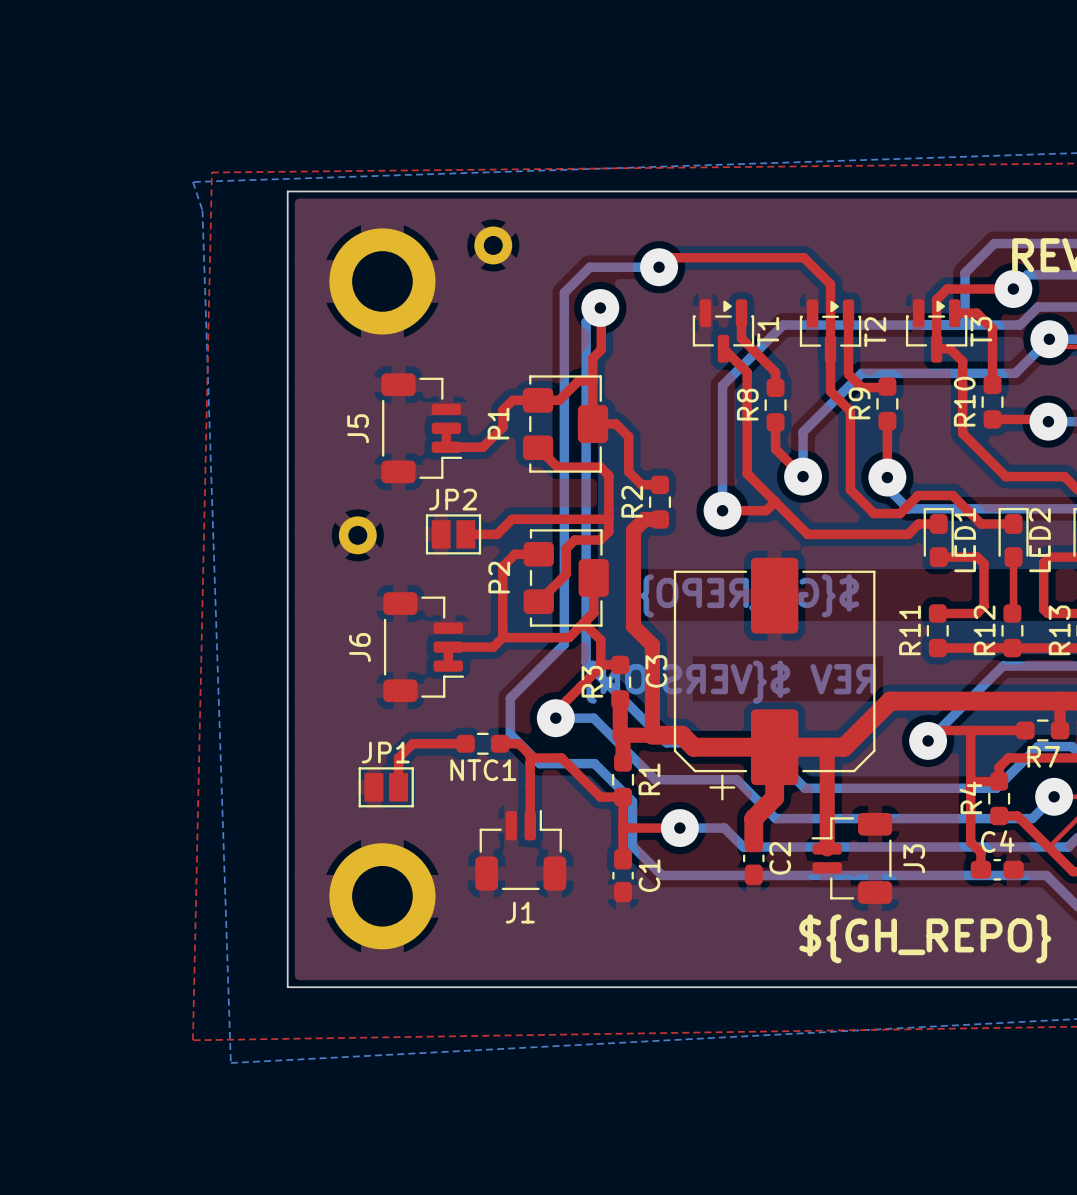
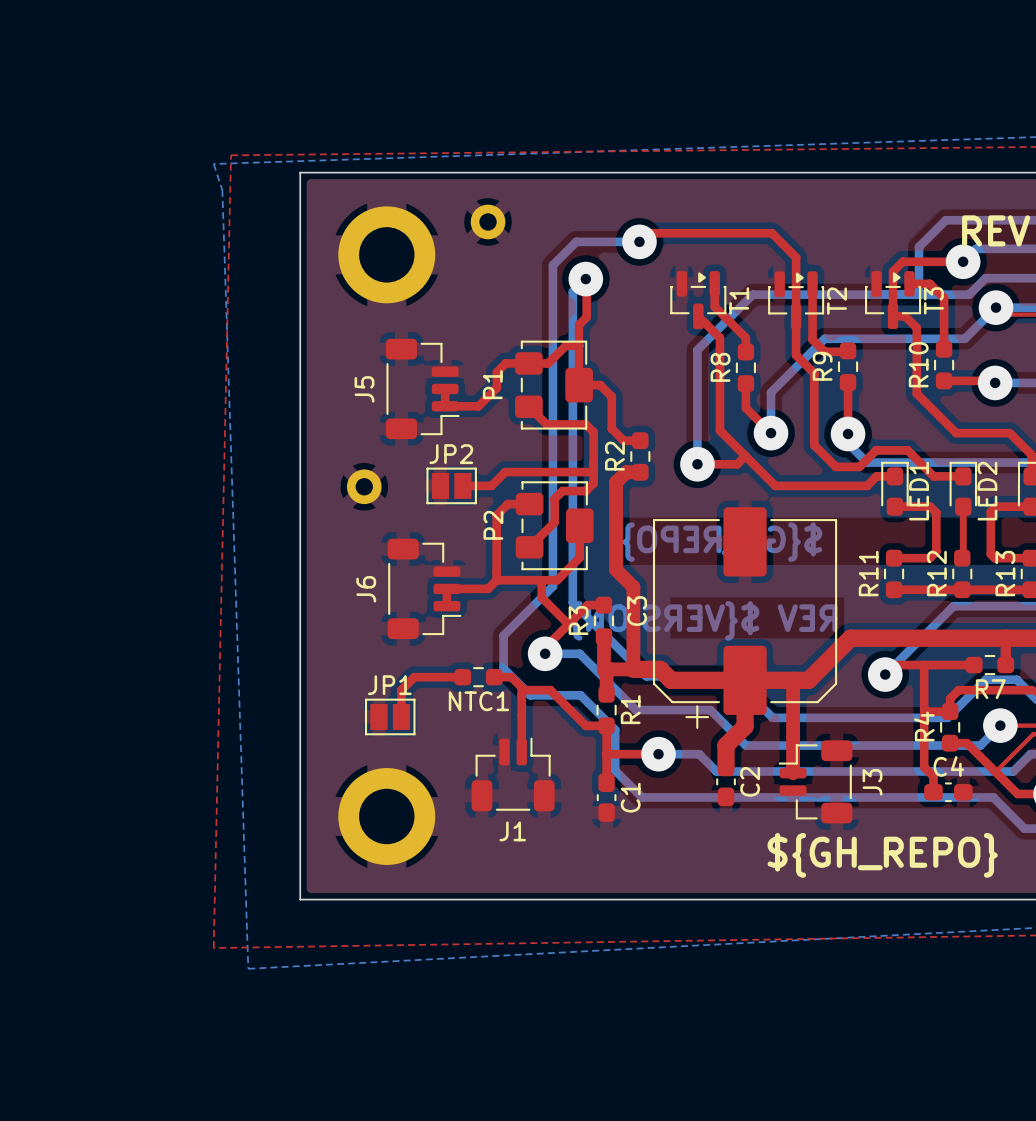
top track: (583, 622) (600, 640) (600, 666) -> none
top track: none -> (541, 580) (541, 597) (568, 624)

